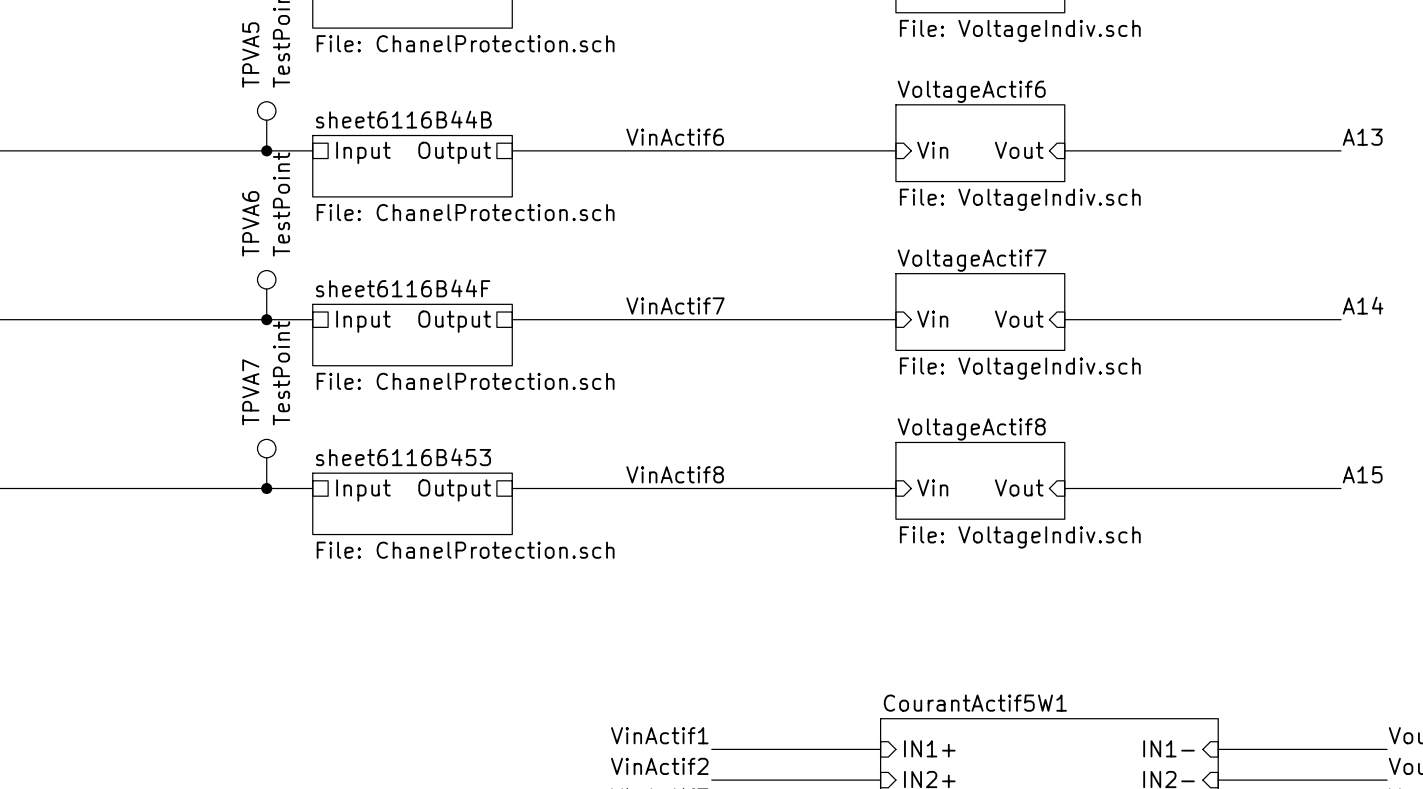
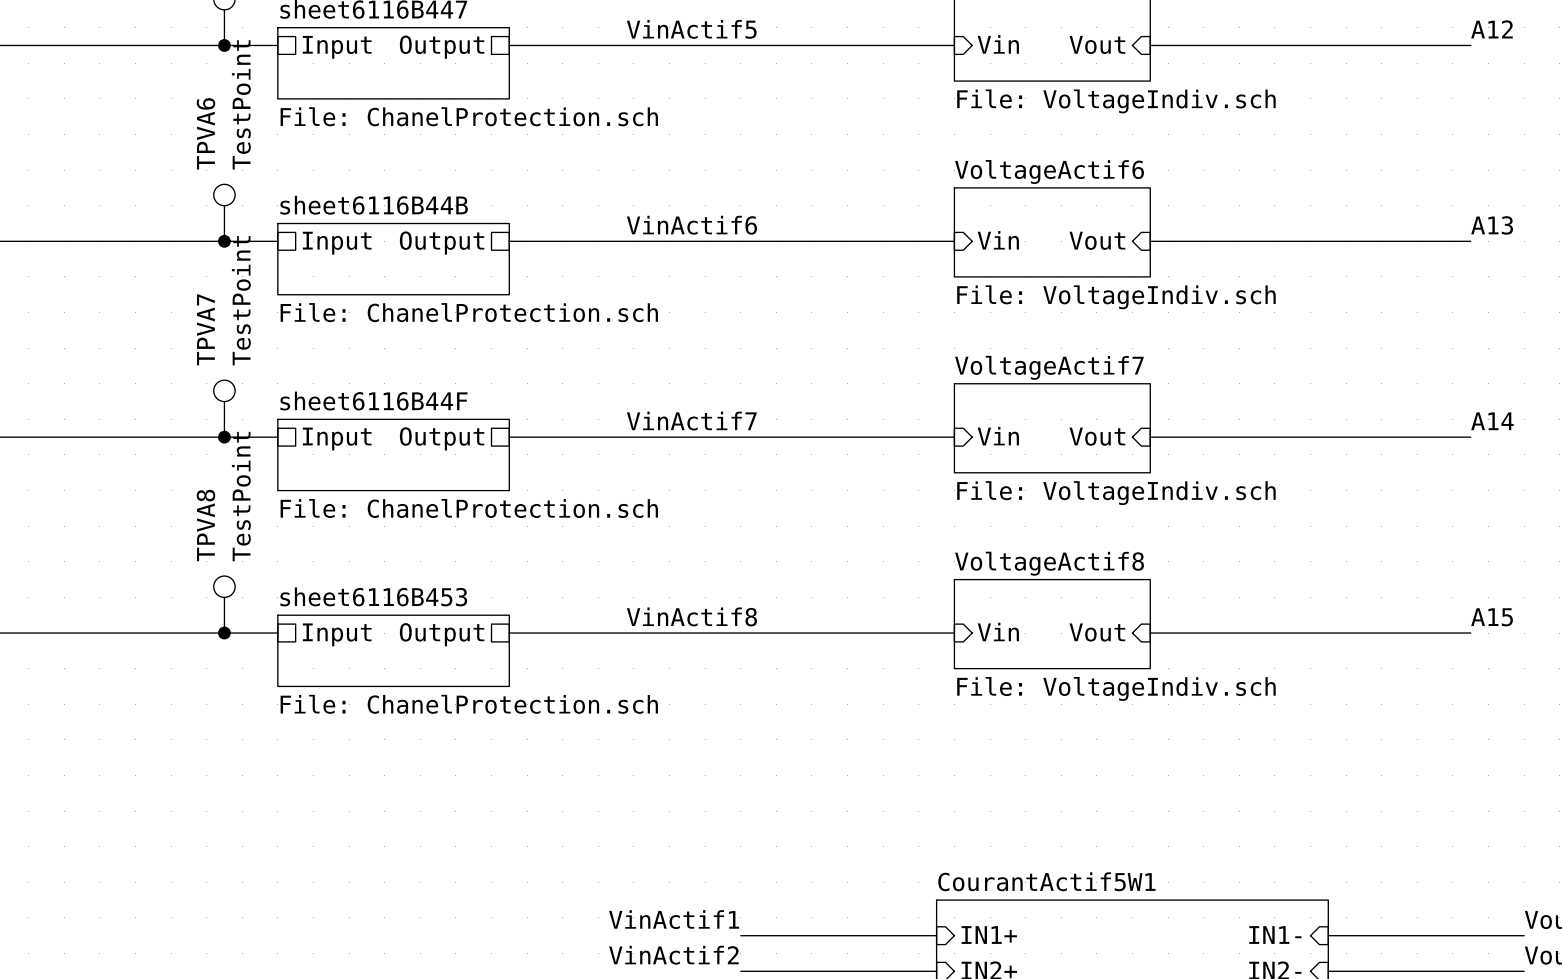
TPVA5 name: TPVA5 (250, 55) -> TPVA6 (205, 133)
TPVA6 name: TPVA6 (250, 223) -> TPVA7 (205, 329)
TPVA7 name: TPVA7 (250, 392) -> TPVA8 (205, 525)

